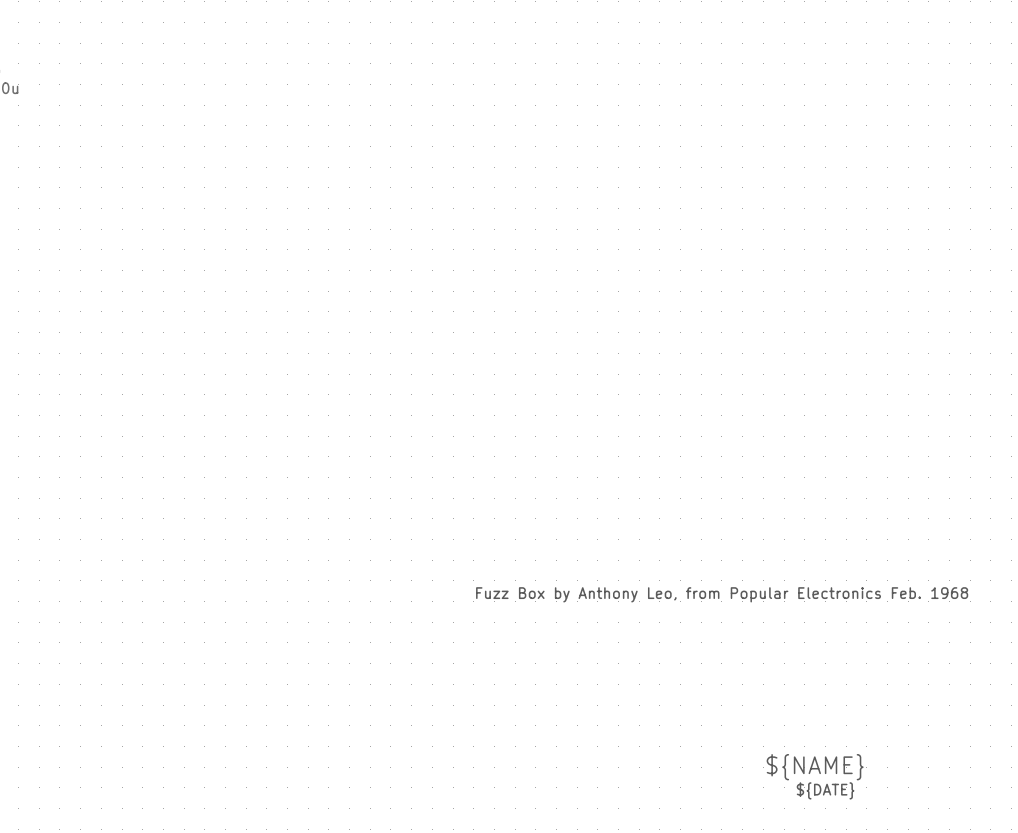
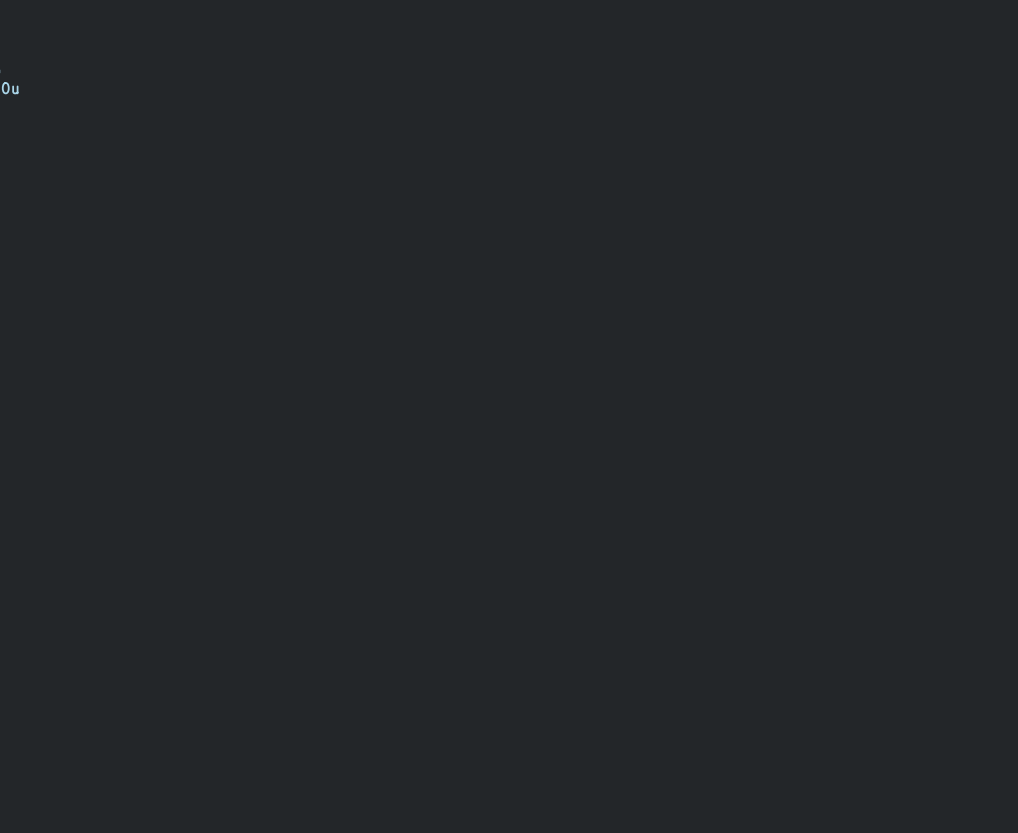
text: Fuzz Box by Anthony Leo, from Popular Electronics Feb. 1968 (722, 594) -> none
text: ${NAME} (815, 767) -> none
text: ${DATE} (825, 790) -> none

